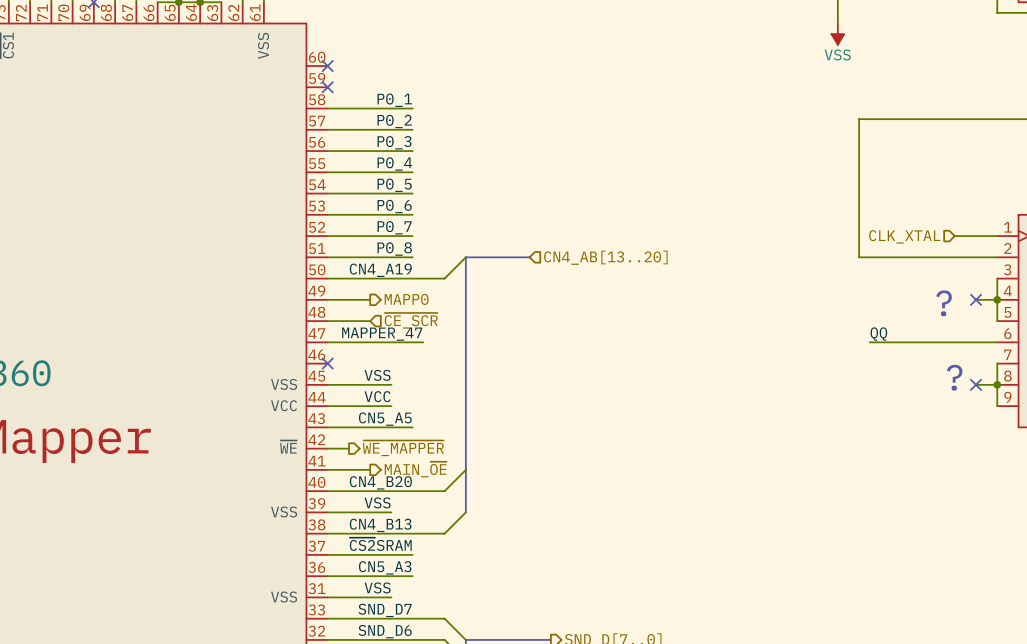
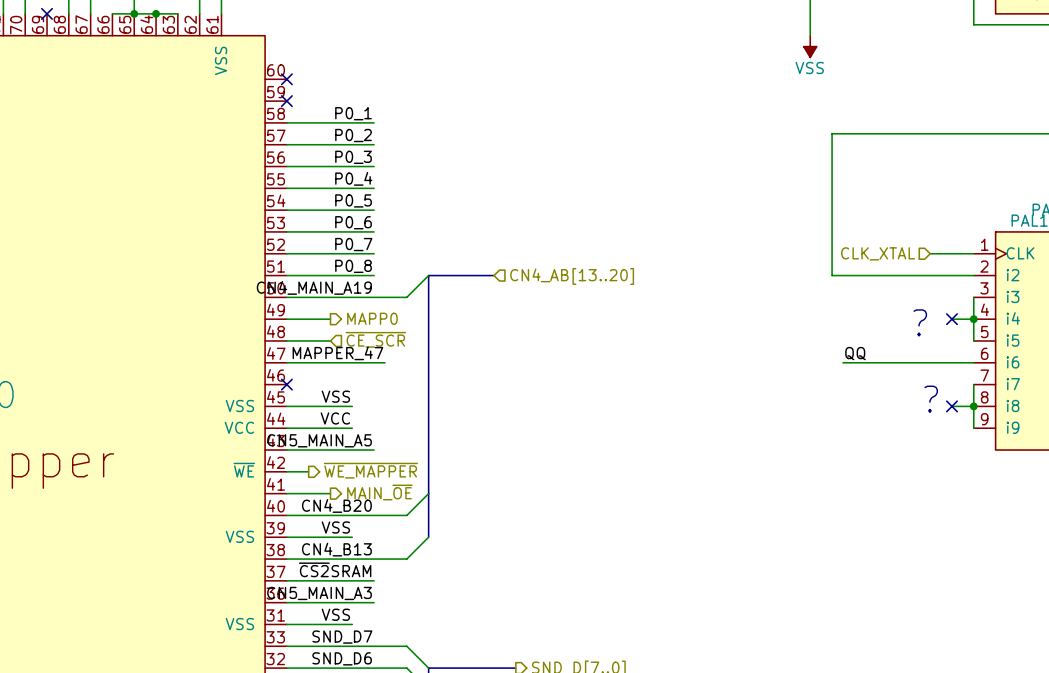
label: CN4_A19 (380, 270) -> CN4_MAIN_A19 (314, 287)
label: CN5_A5 (385, 419) -> CN5_MAIN_A5 (319, 440)
label: CN5_A3 (385, 567) -> CN5_MAIN_A3 (319, 593)

